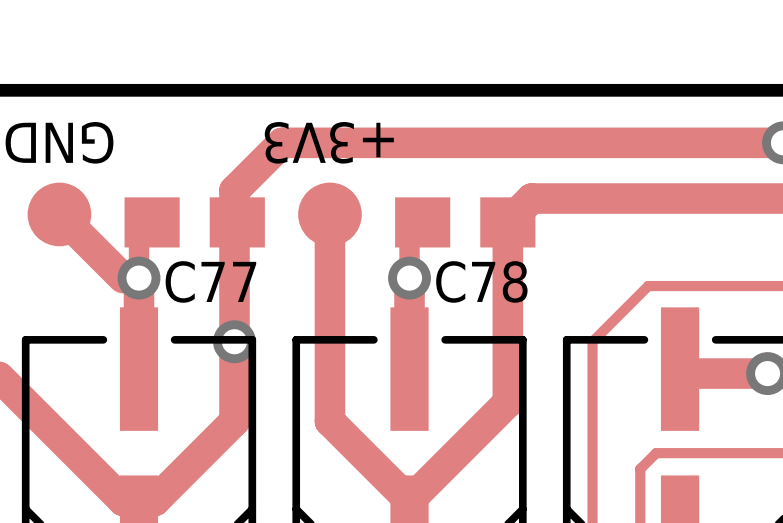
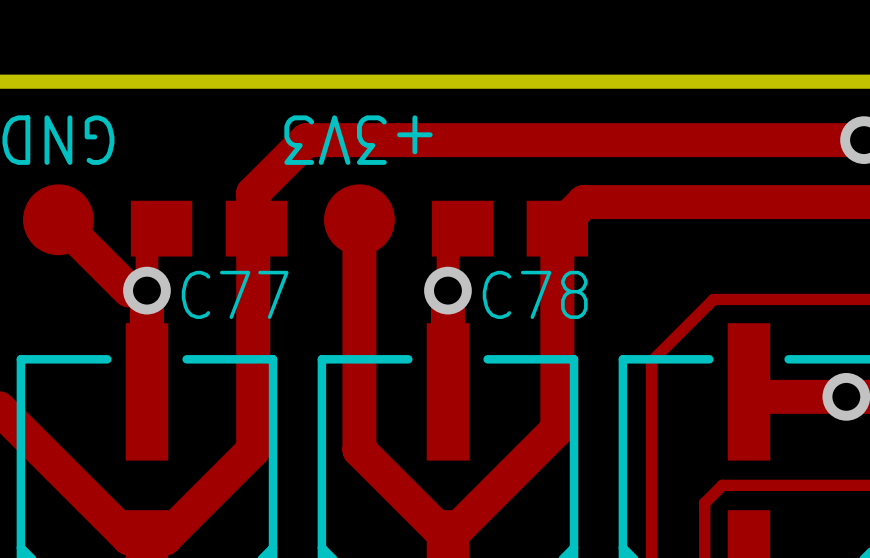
via: (234, 341) -> none

